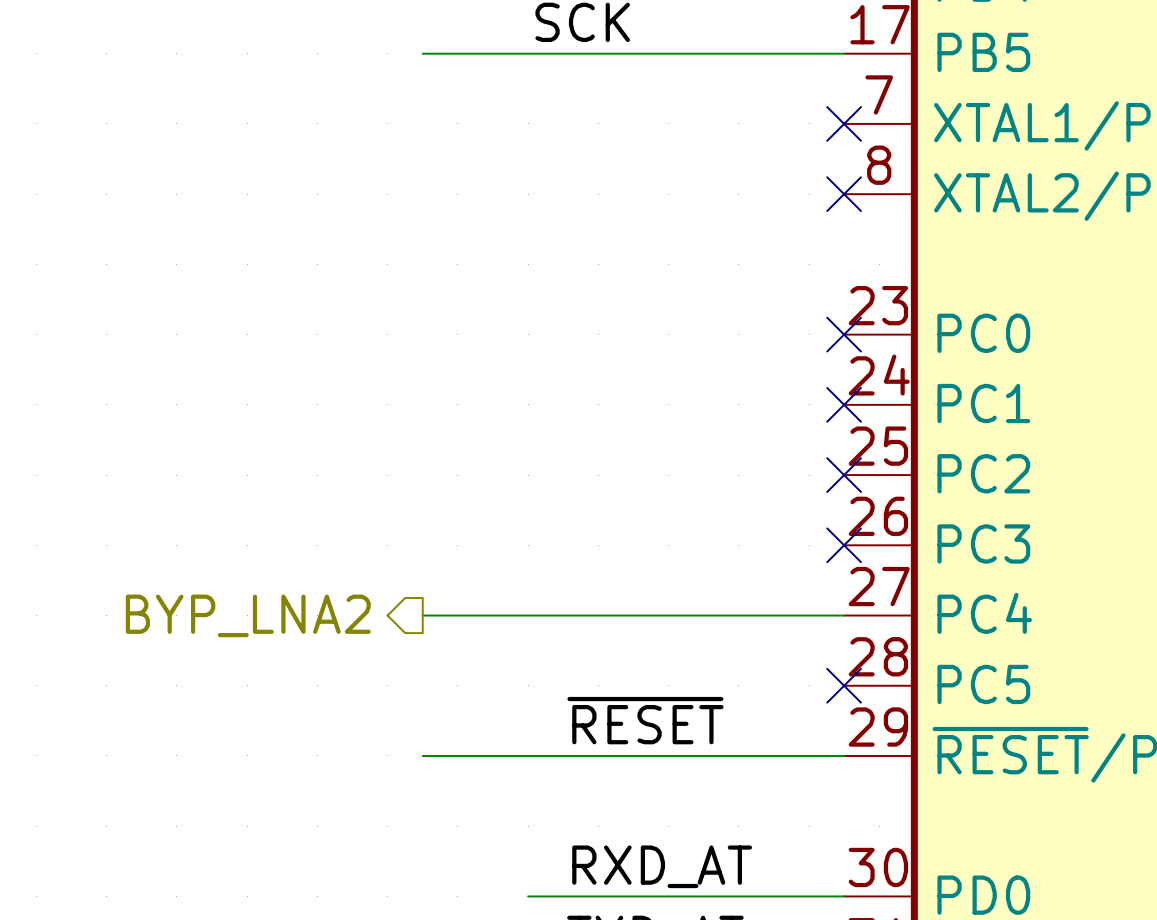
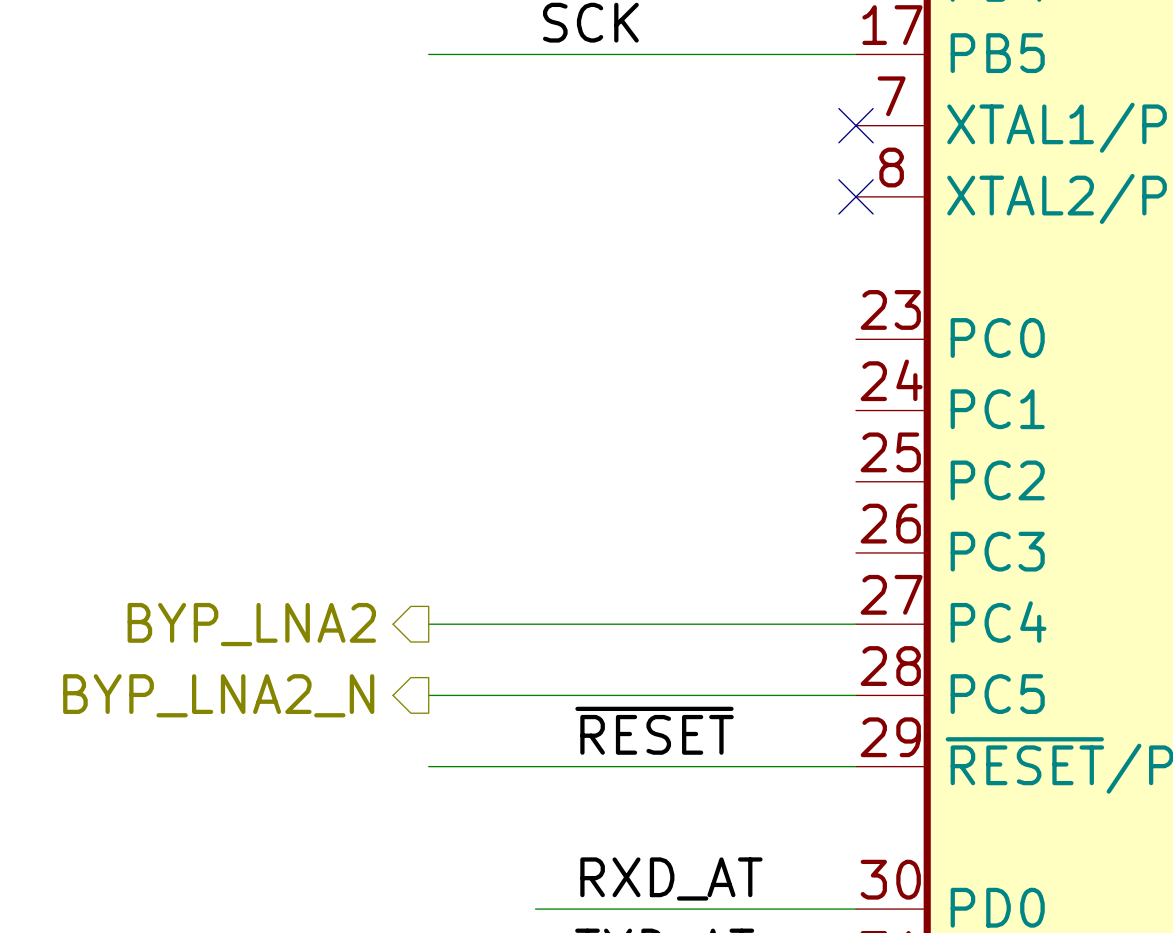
no-connect mark: (844, 334) -> none
no-connect mark: (844, 404) -> none
no-connect mark: (844, 475) -> none
no-connect mark: (844, 545) -> none
wire: none -> (428, 695) (856, 695)
no-connect mark: (844, 685) -> none
hierarchical label: none -> BYP_LNA2_N (218, 695)

